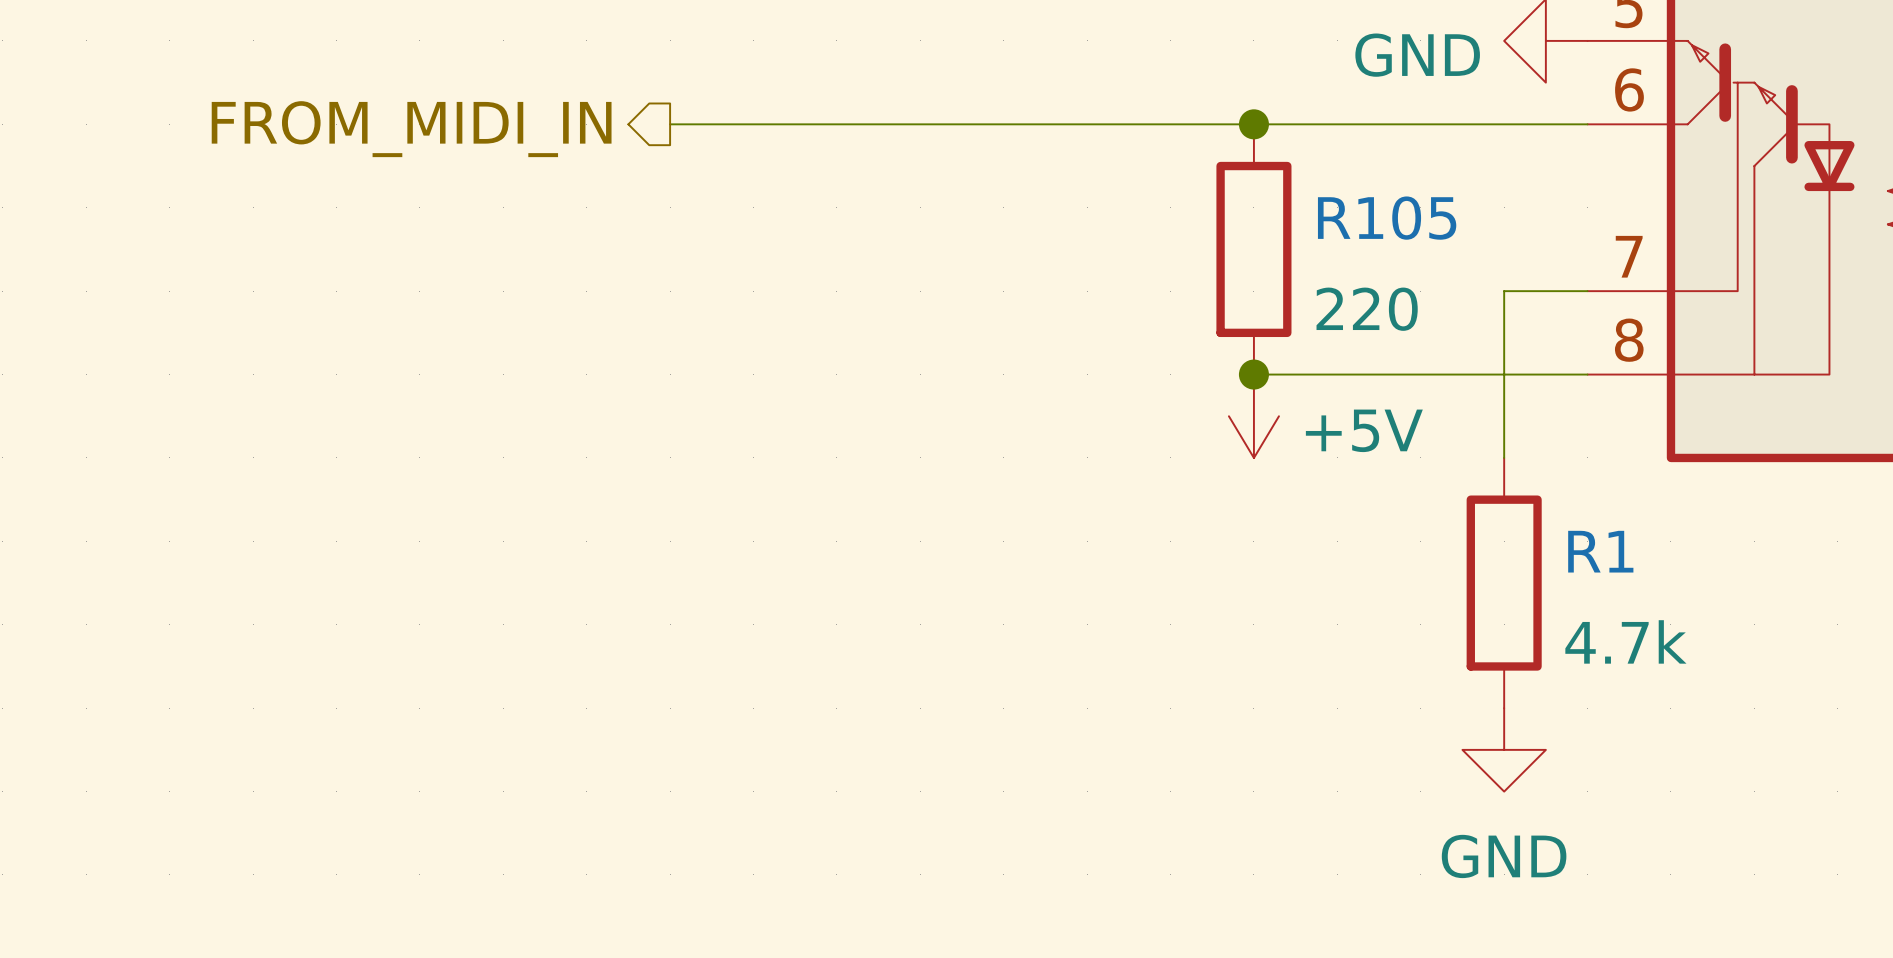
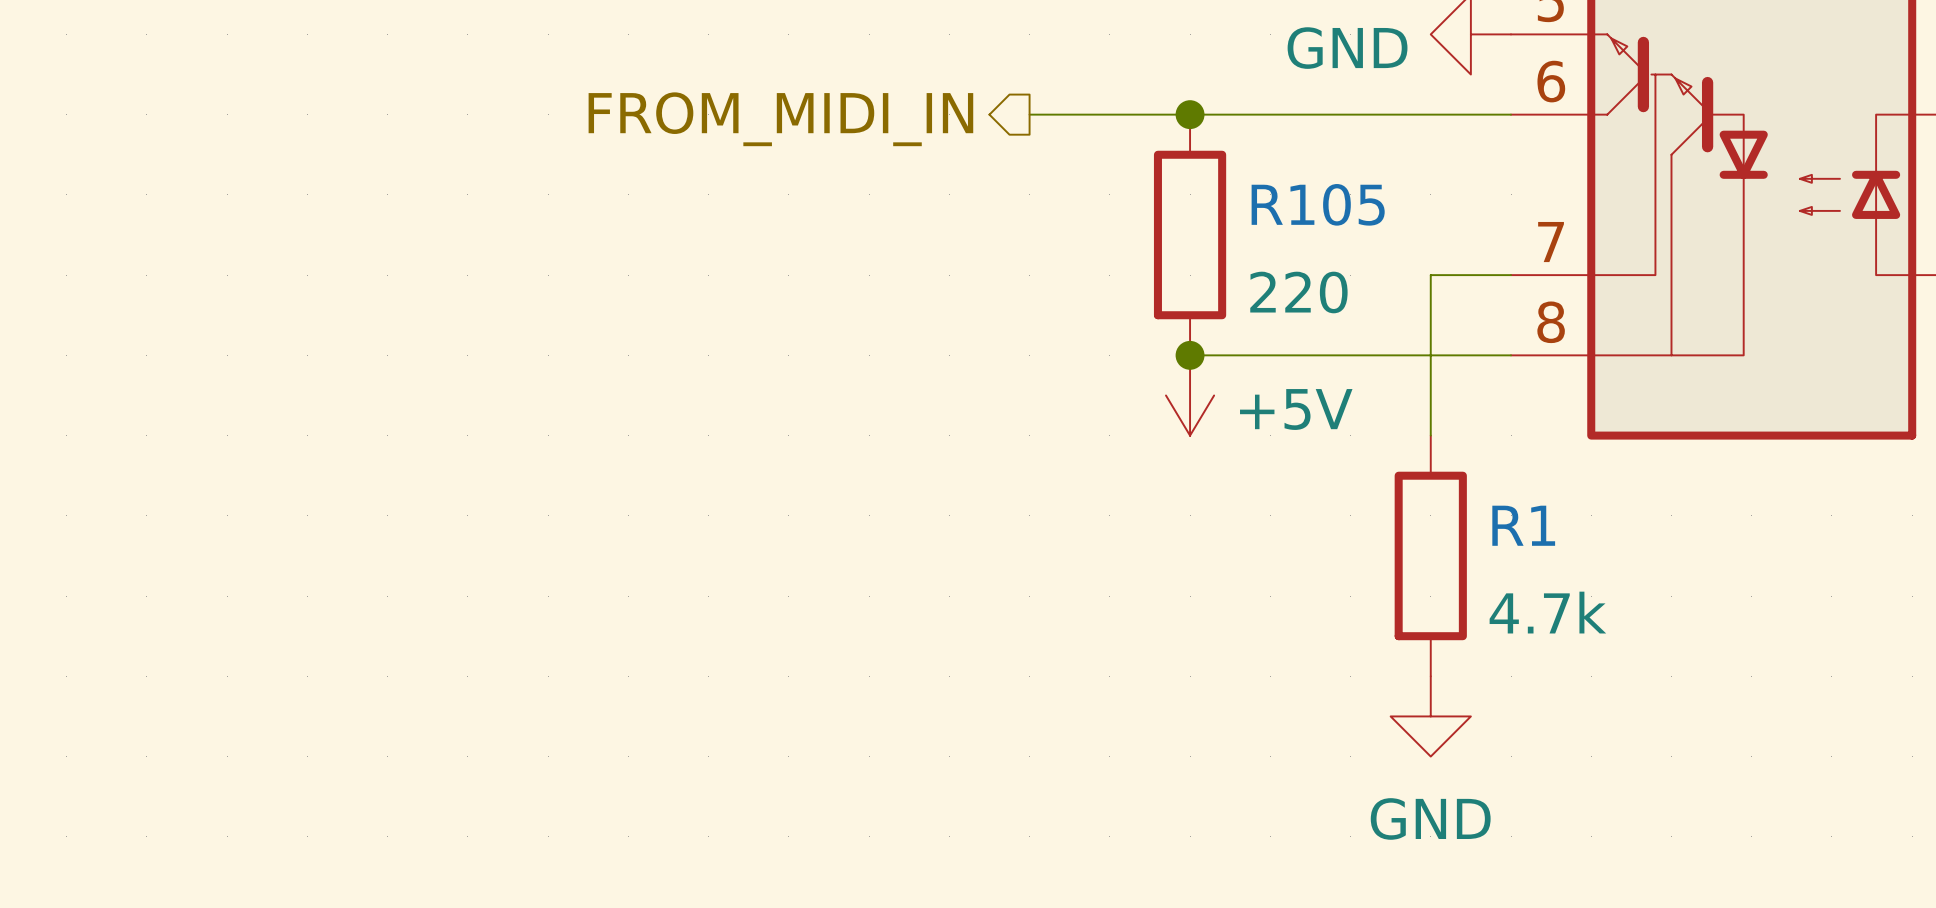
wire: (670, 124) (1087, 124) -> none
hierarchical label position: FROM_MIDI_IN (411, 129) -> FROM_MIDI_IN (780, 119)

